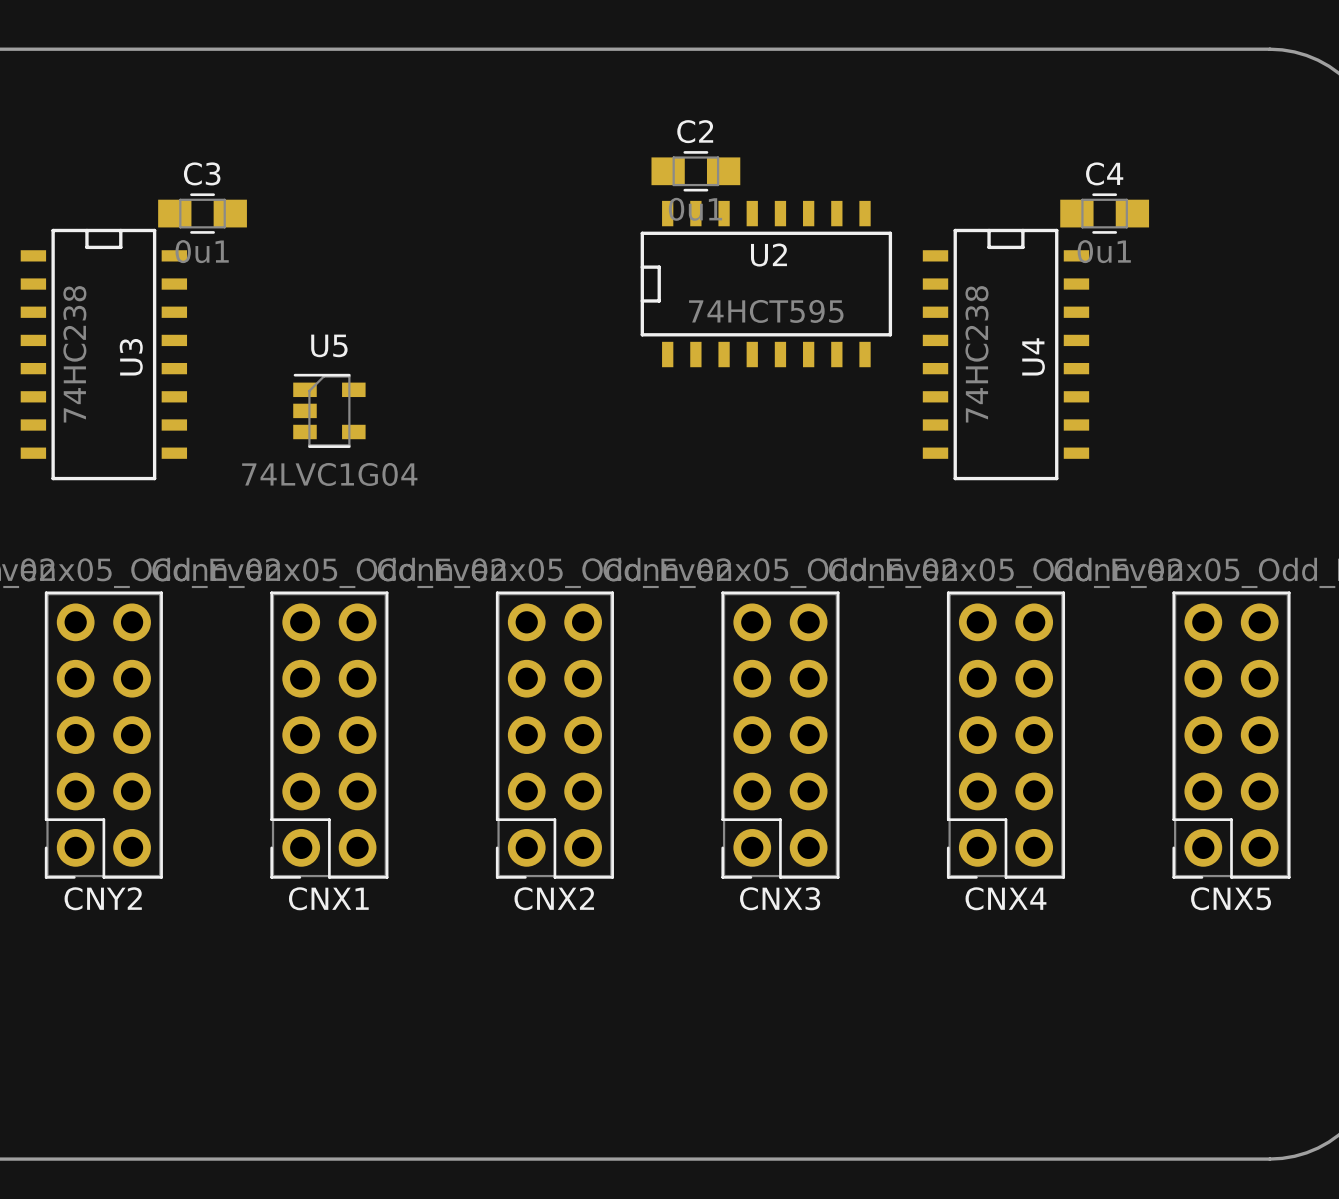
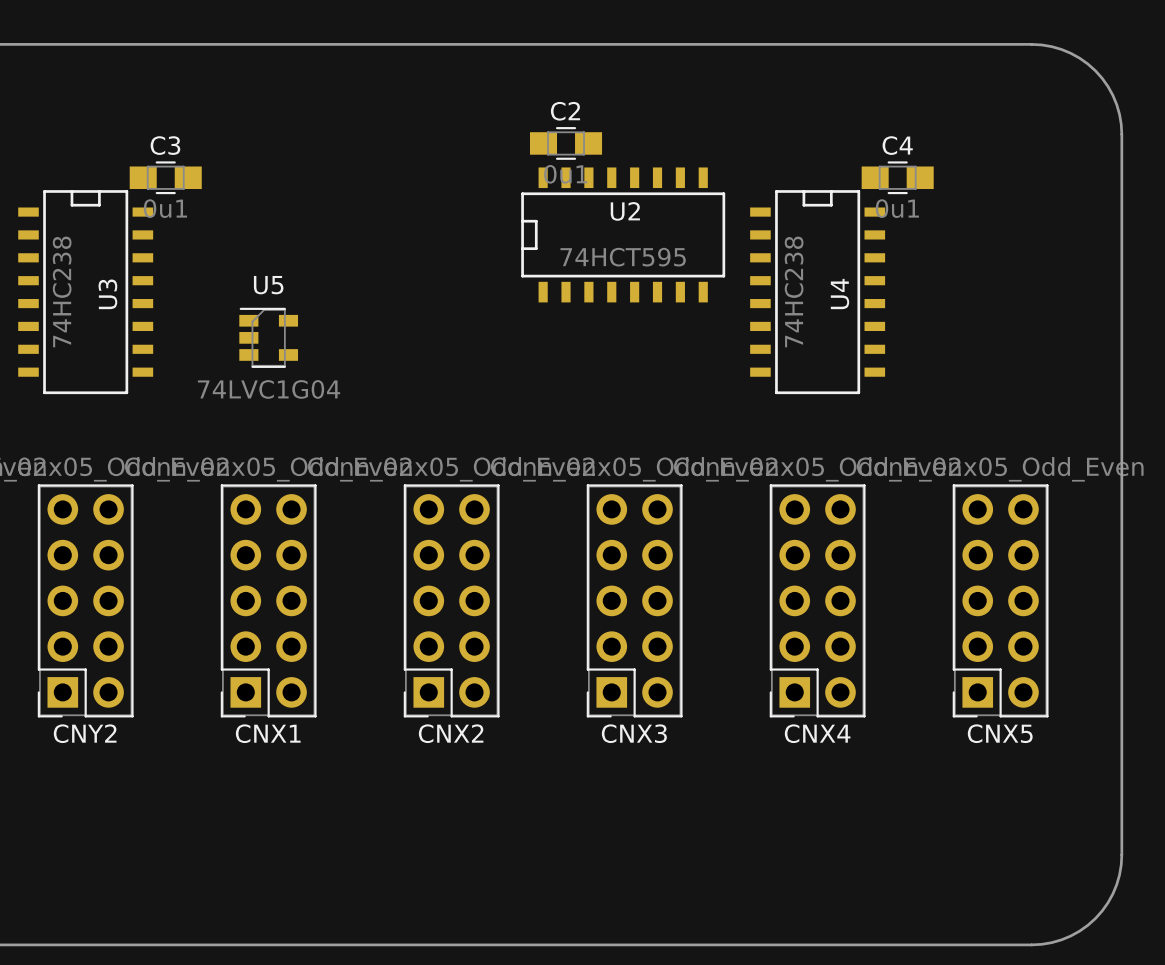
CNY2 footprint: [44, 591, 163, 879] -> [37, 484, 134, 718]
CNX1 footprint: [270, 591, 389, 879] -> [220, 484, 317, 718]
CNX2 footprint: [495, 591, 614, 879] -> [403, 484, 500, 718]
CNX3 footprint: [721, 591, 840, 879] -> [586, 484, 683, 718]
CNX4 footprint: [946, 591, 1066, 879] -> [769, 484, 866, 718]
CNX5 footprint: [1172, 591, 1291, 879] -> [952, 484, 1049, 718]

